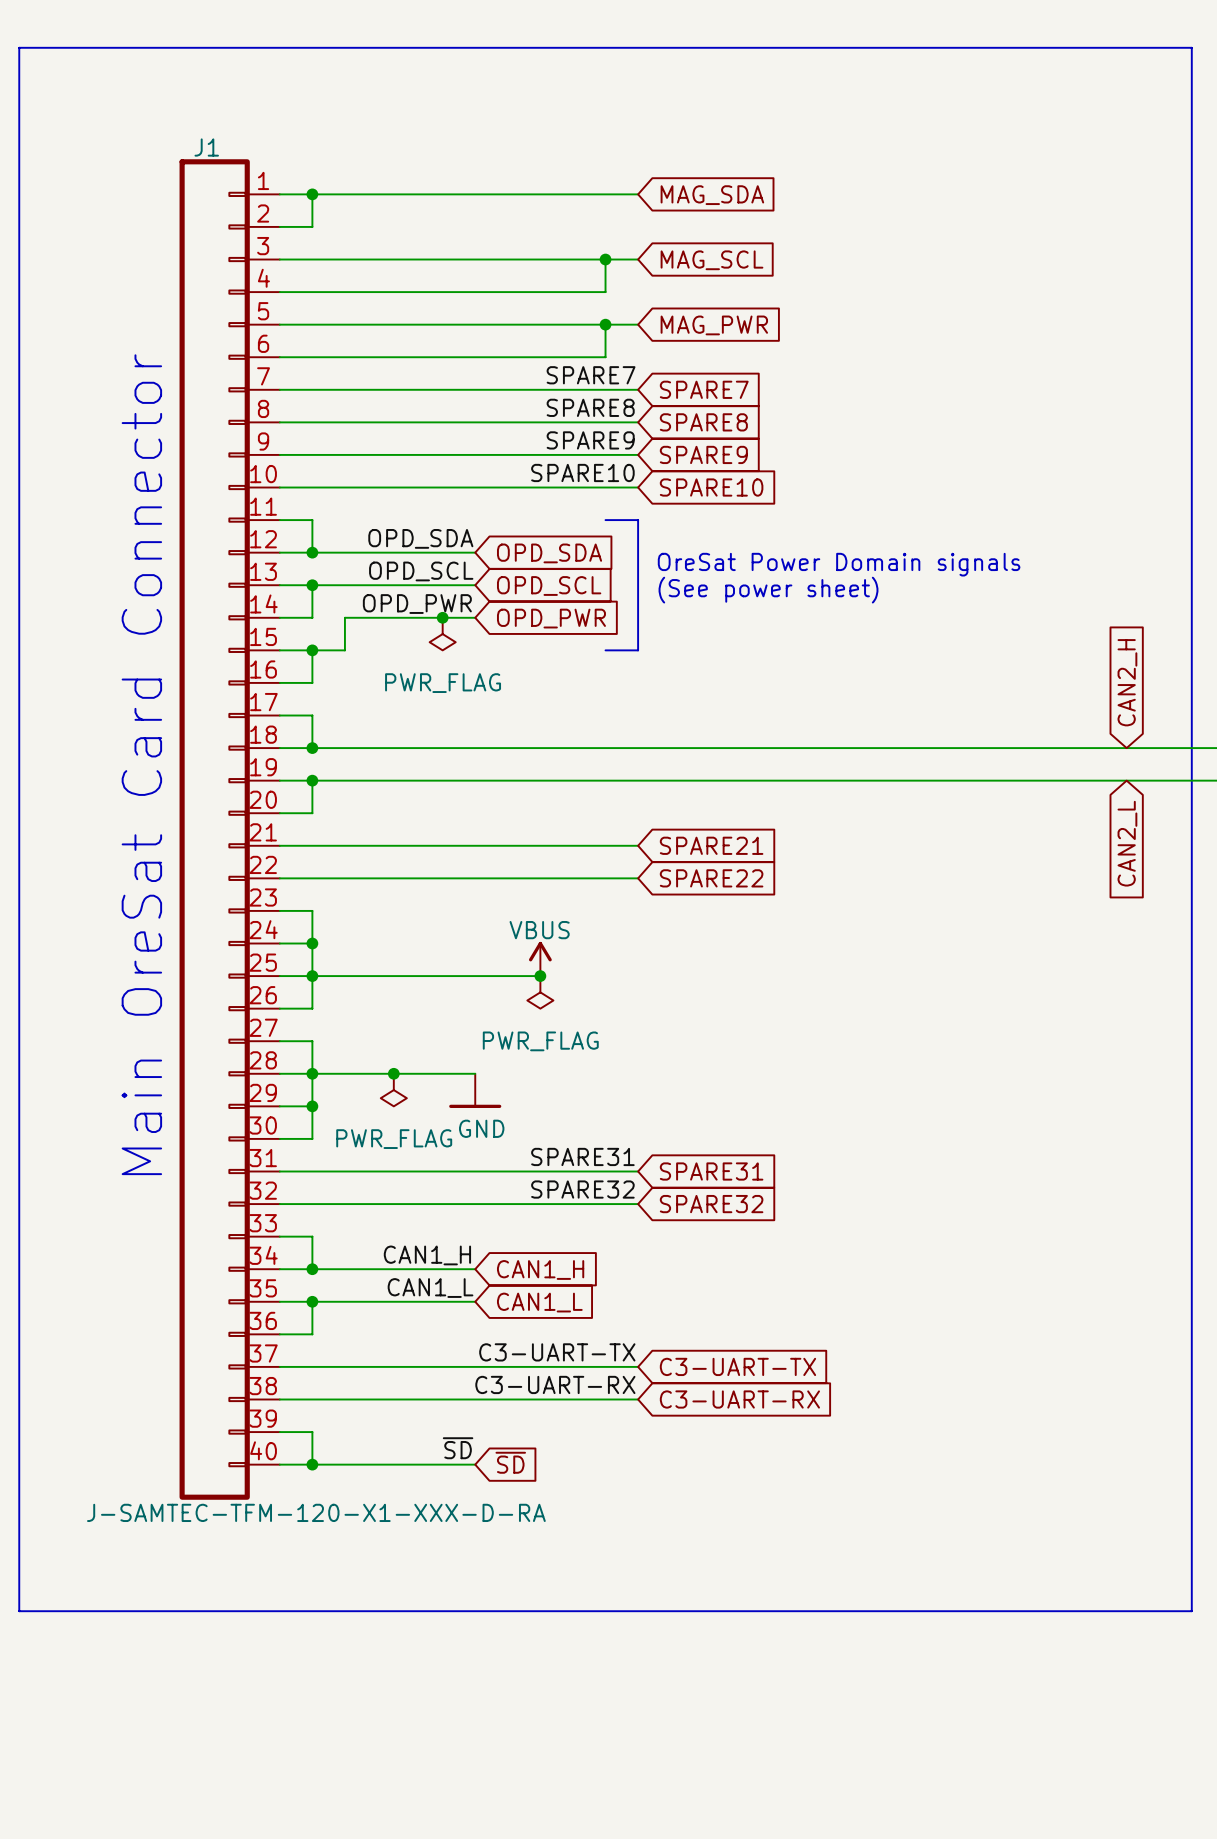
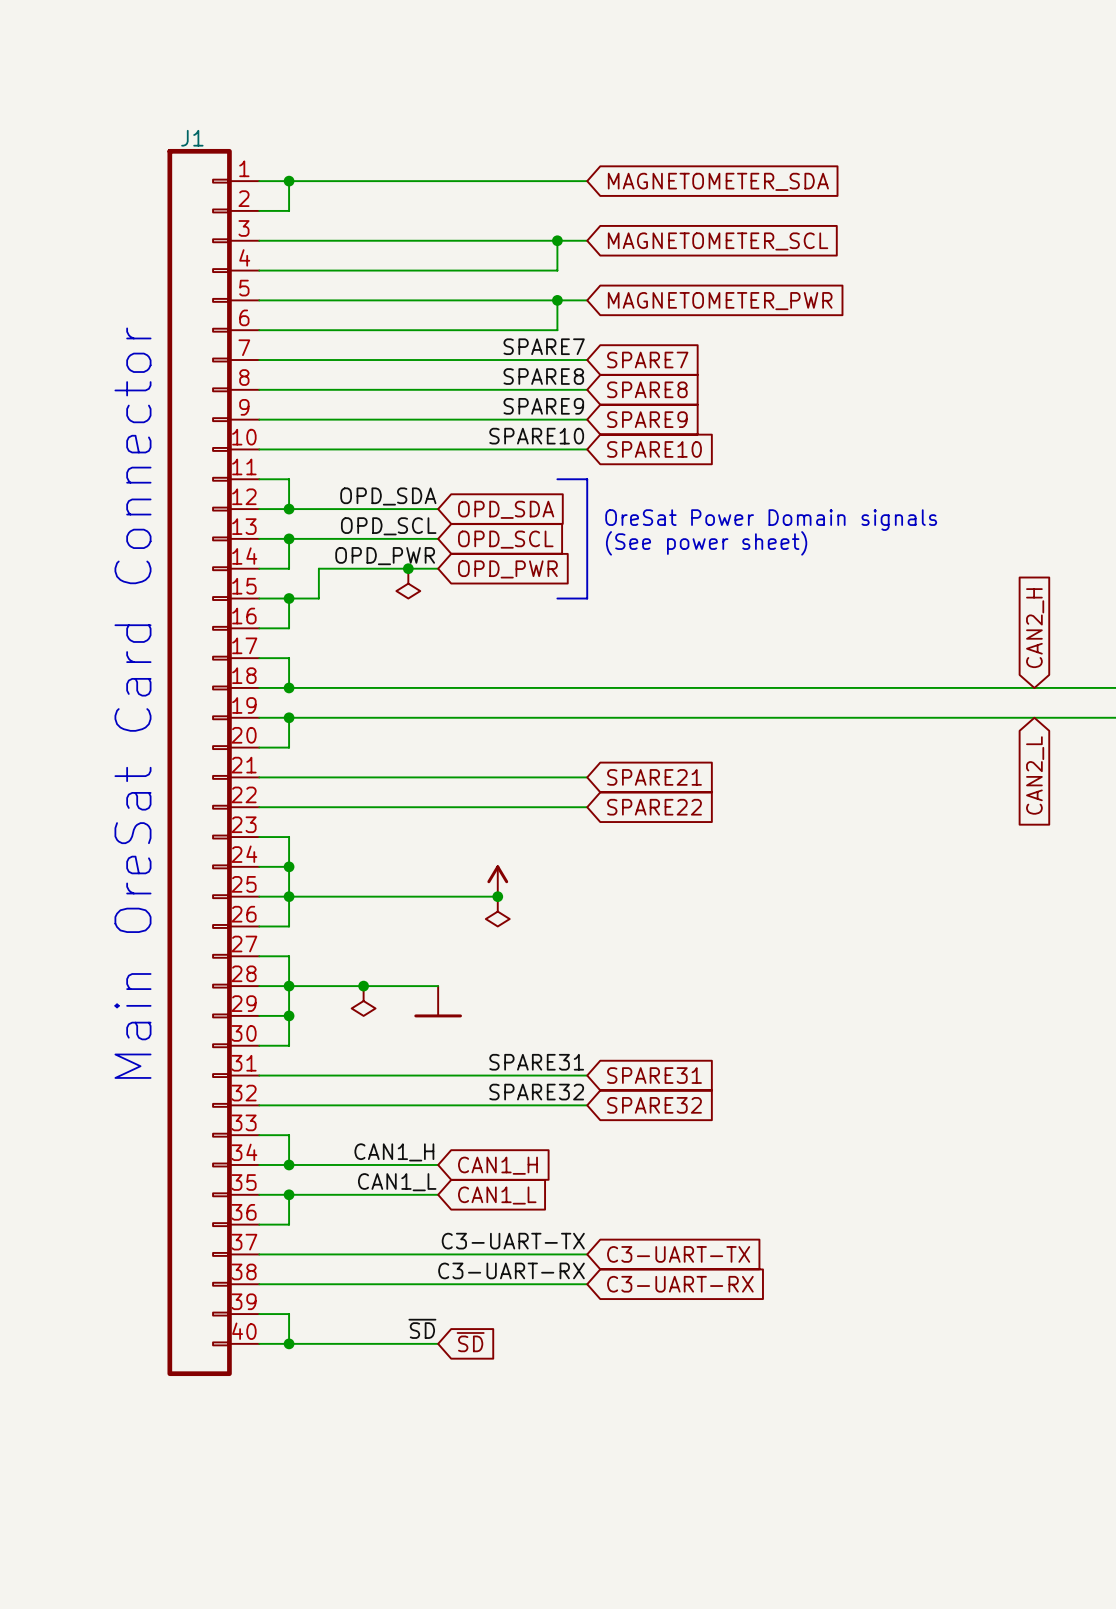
line: (19, 47) (19, 1611) (1191, 1611) (1191, 47) (19, 47) -> none
global label: MAG_SDA (712, 195) -> MAGNETOMETER_SDA (718, 181)
global label: MAG_SCL (711, 260) -> MAGNETOMETER_SCL (718, 241)
global label: MAG_PWR (714, 325) -> MAGNETOMETER_PWR (720, 301)
power symbol text: PWR_FLAG (443, 683) -> none
power symbol text: VBUS (539, 930) -> none
power symbol text: PWR_FLAG (540, 1041) -> none
power symbol text: GND (481, 1128) -> none
power symbol text: PWR_FLAG (394, 1139) -> none
J1 value: J-SAMTEC-TFM-120-X1-XXX-D-RA (316, 1512) -> none

